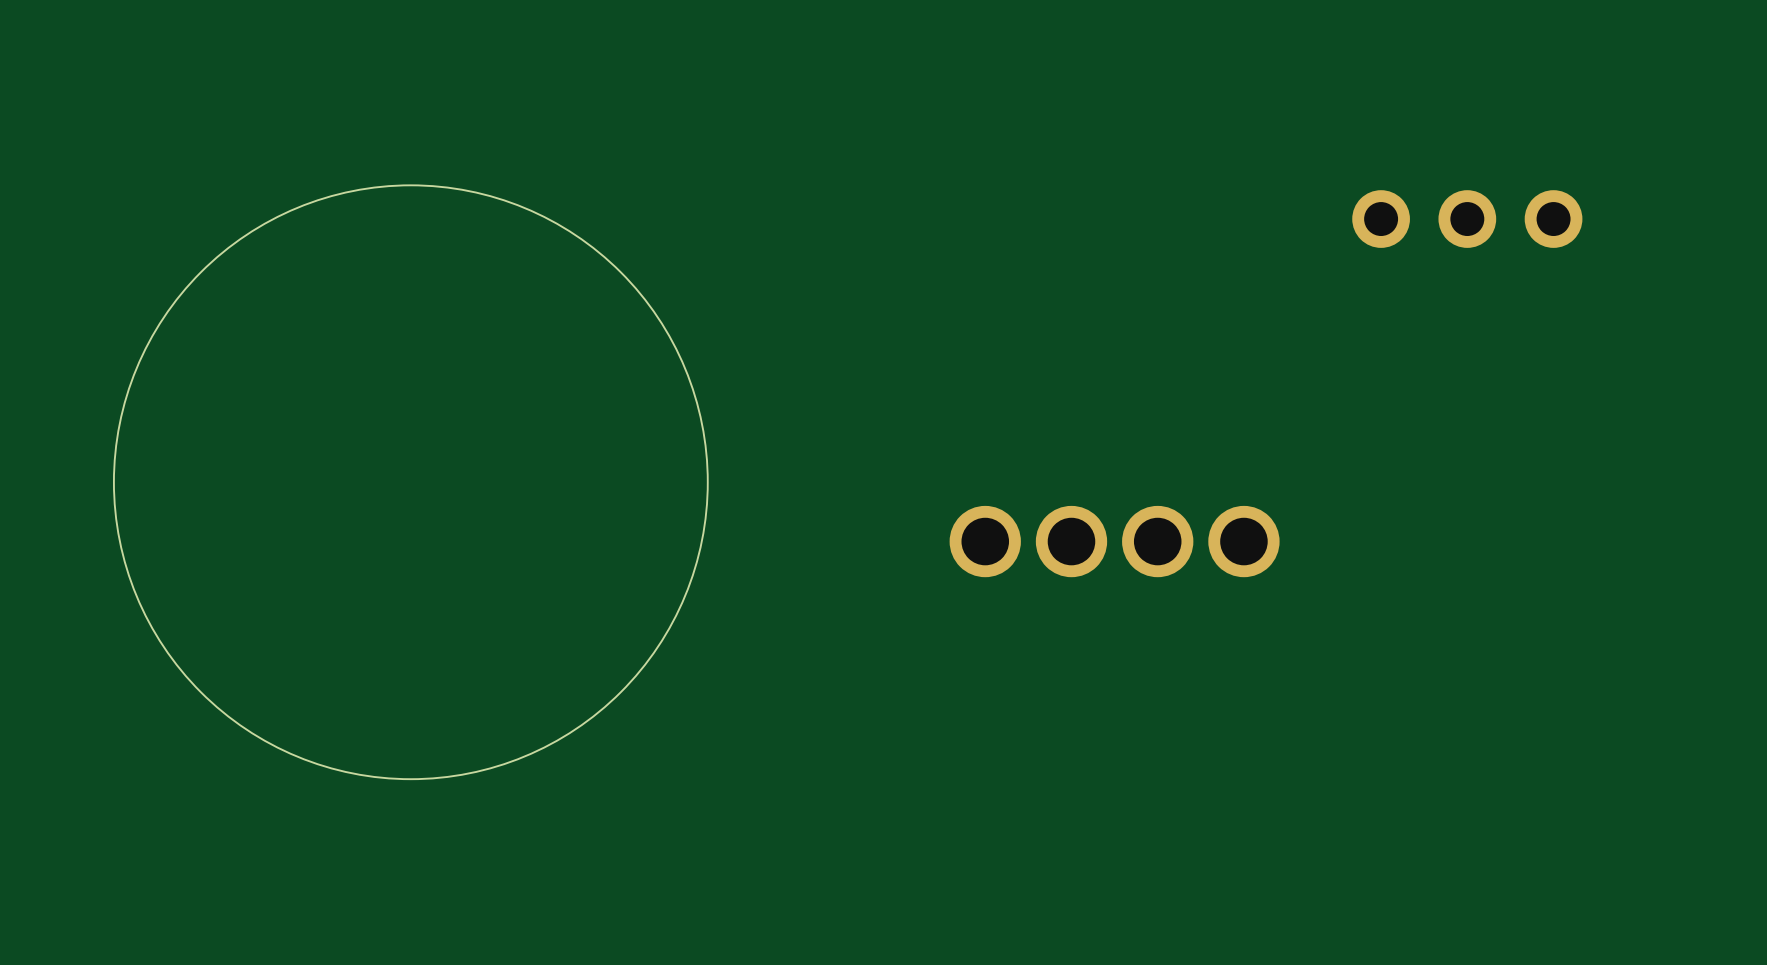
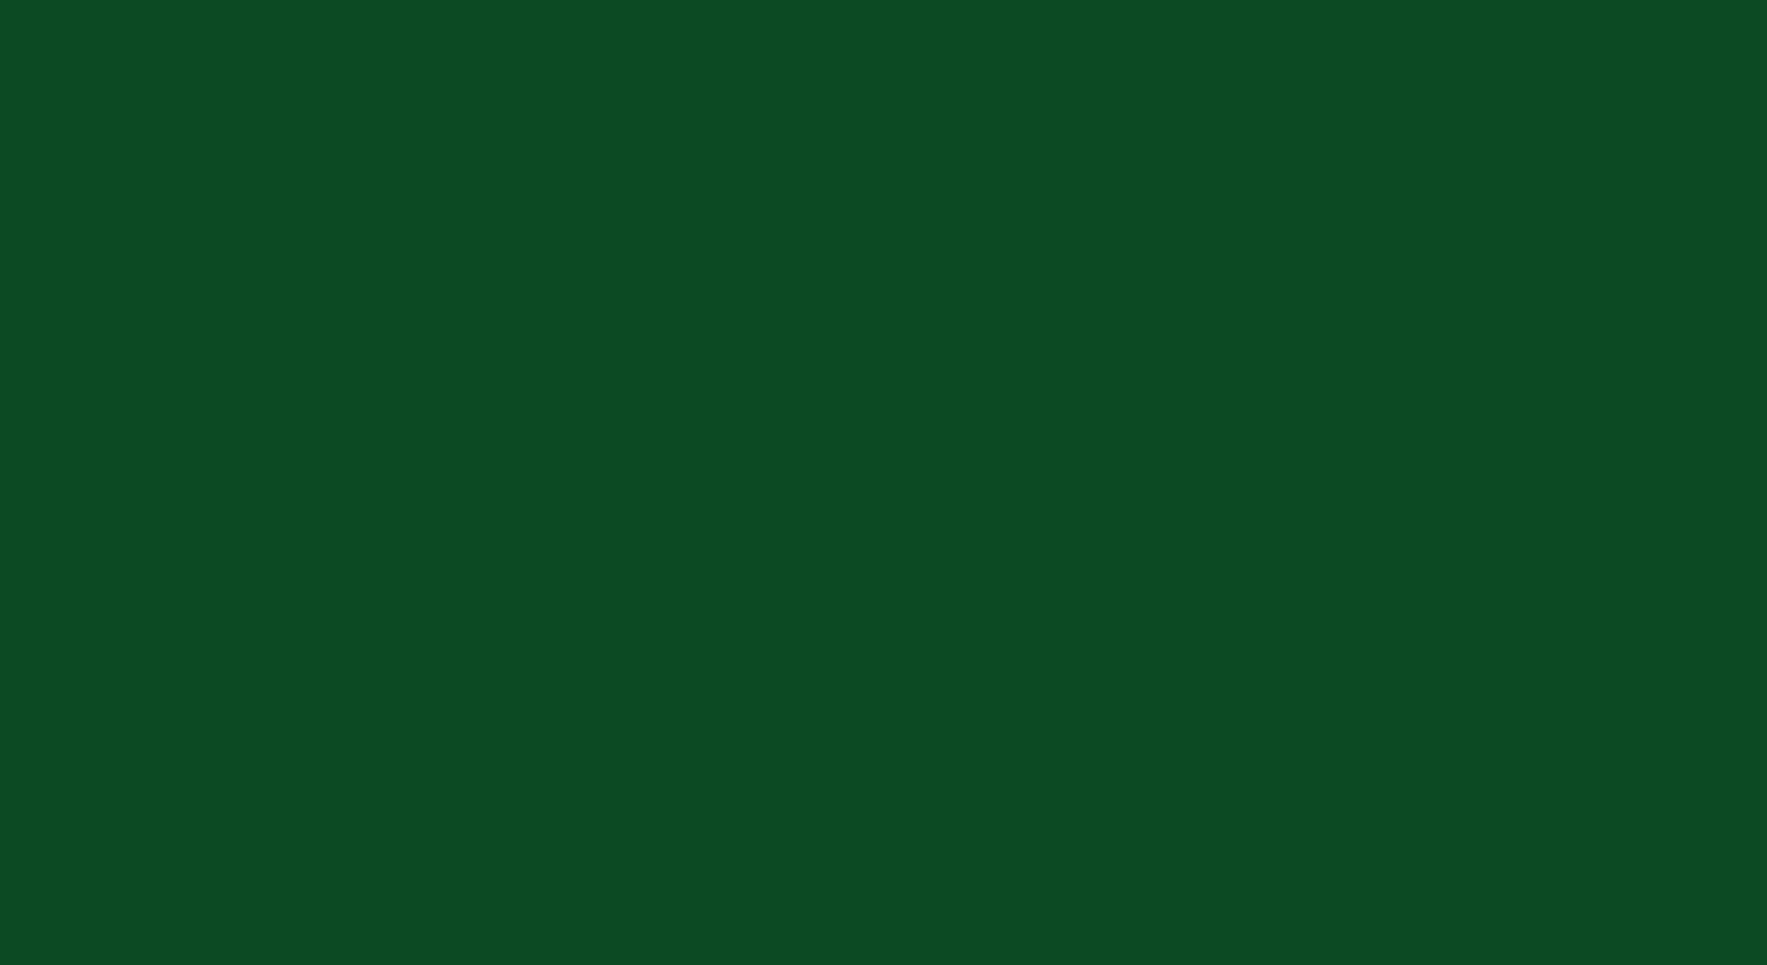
round board edge: [113, 184, 709, 781] -> none
part: (1467, 219) -> none
part: (1114, 541) -> none

